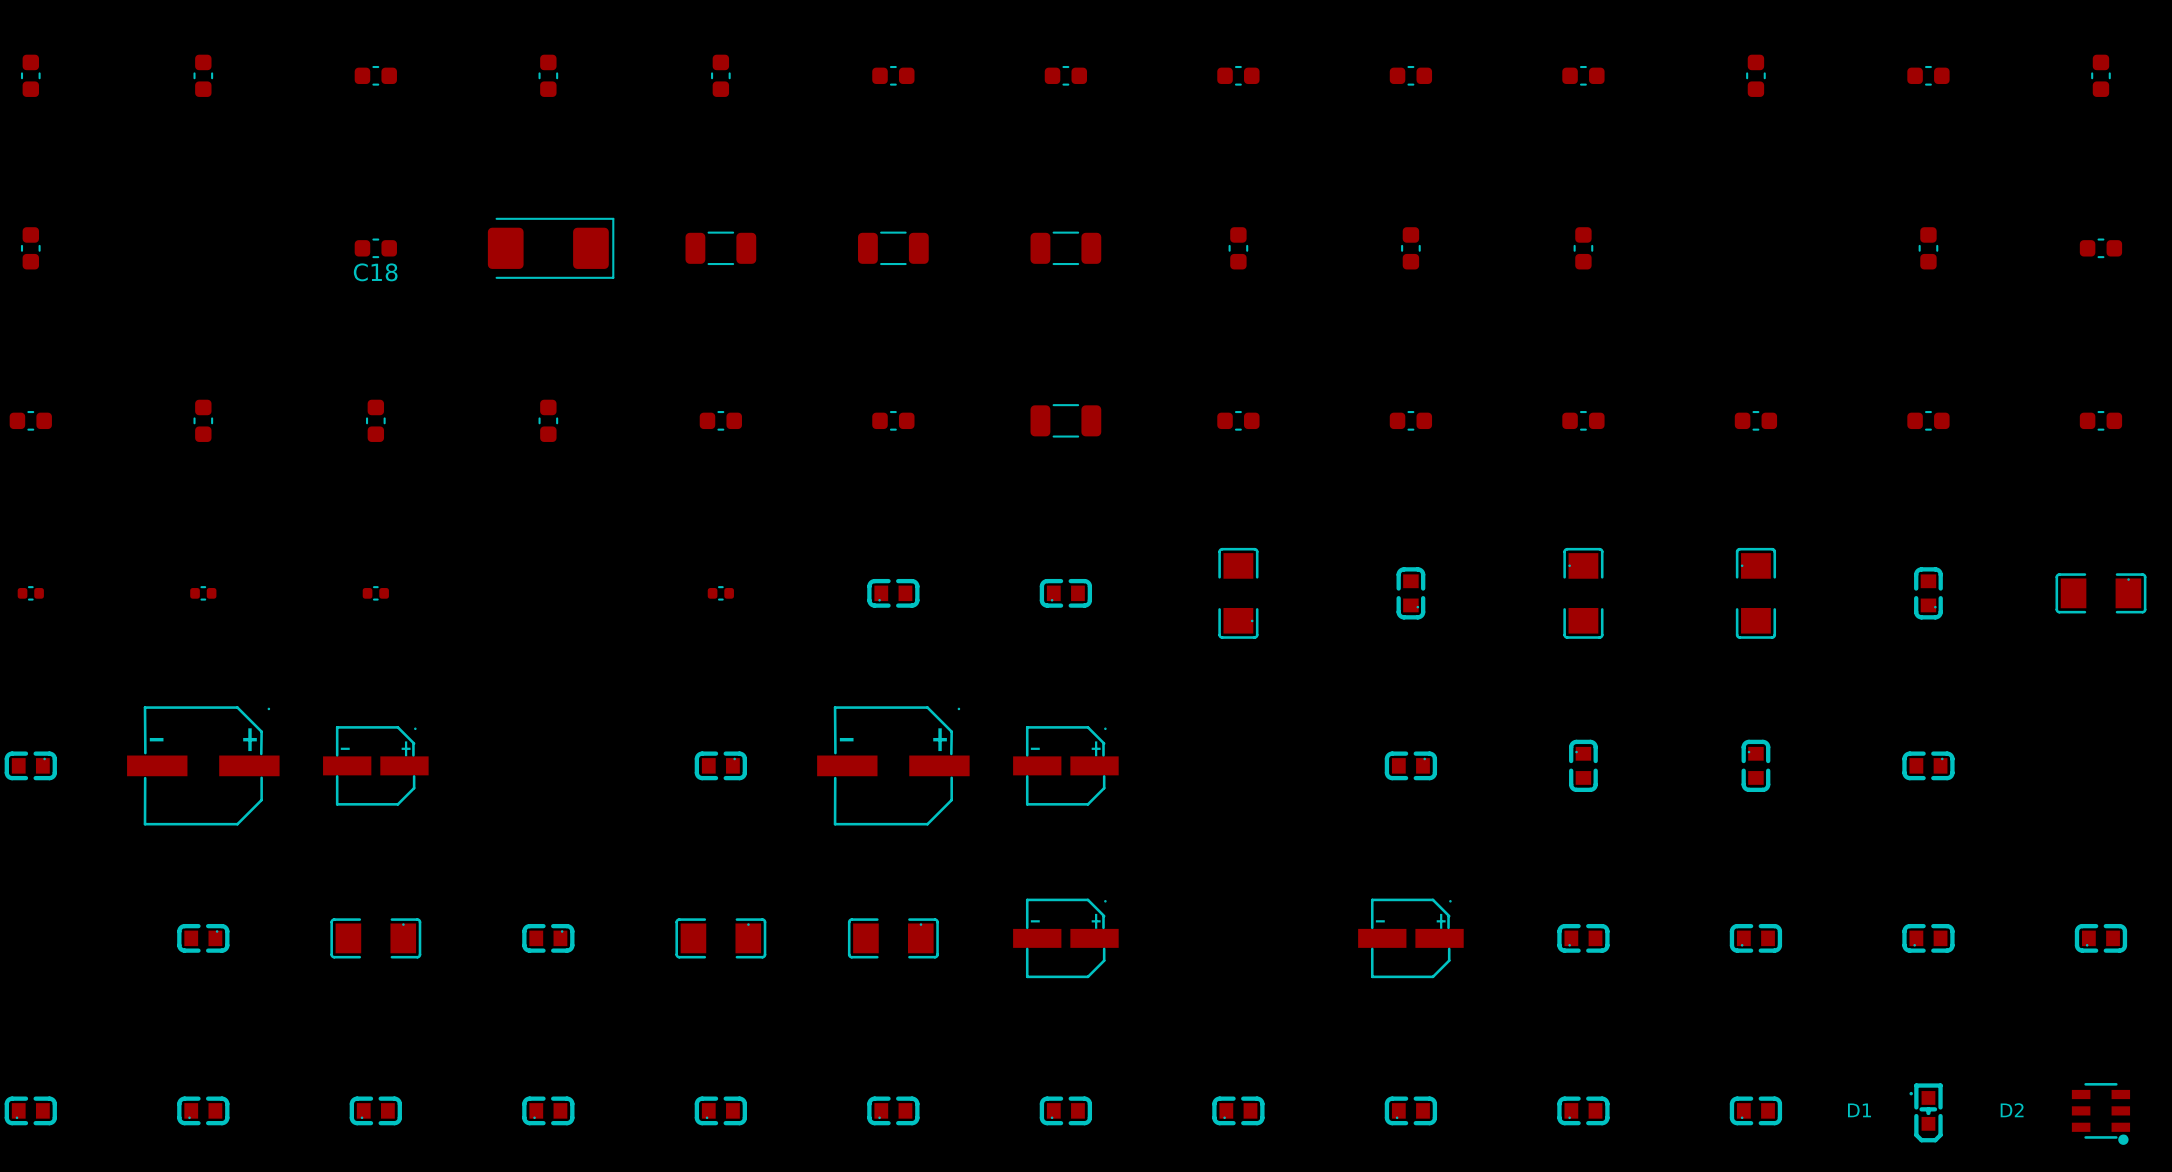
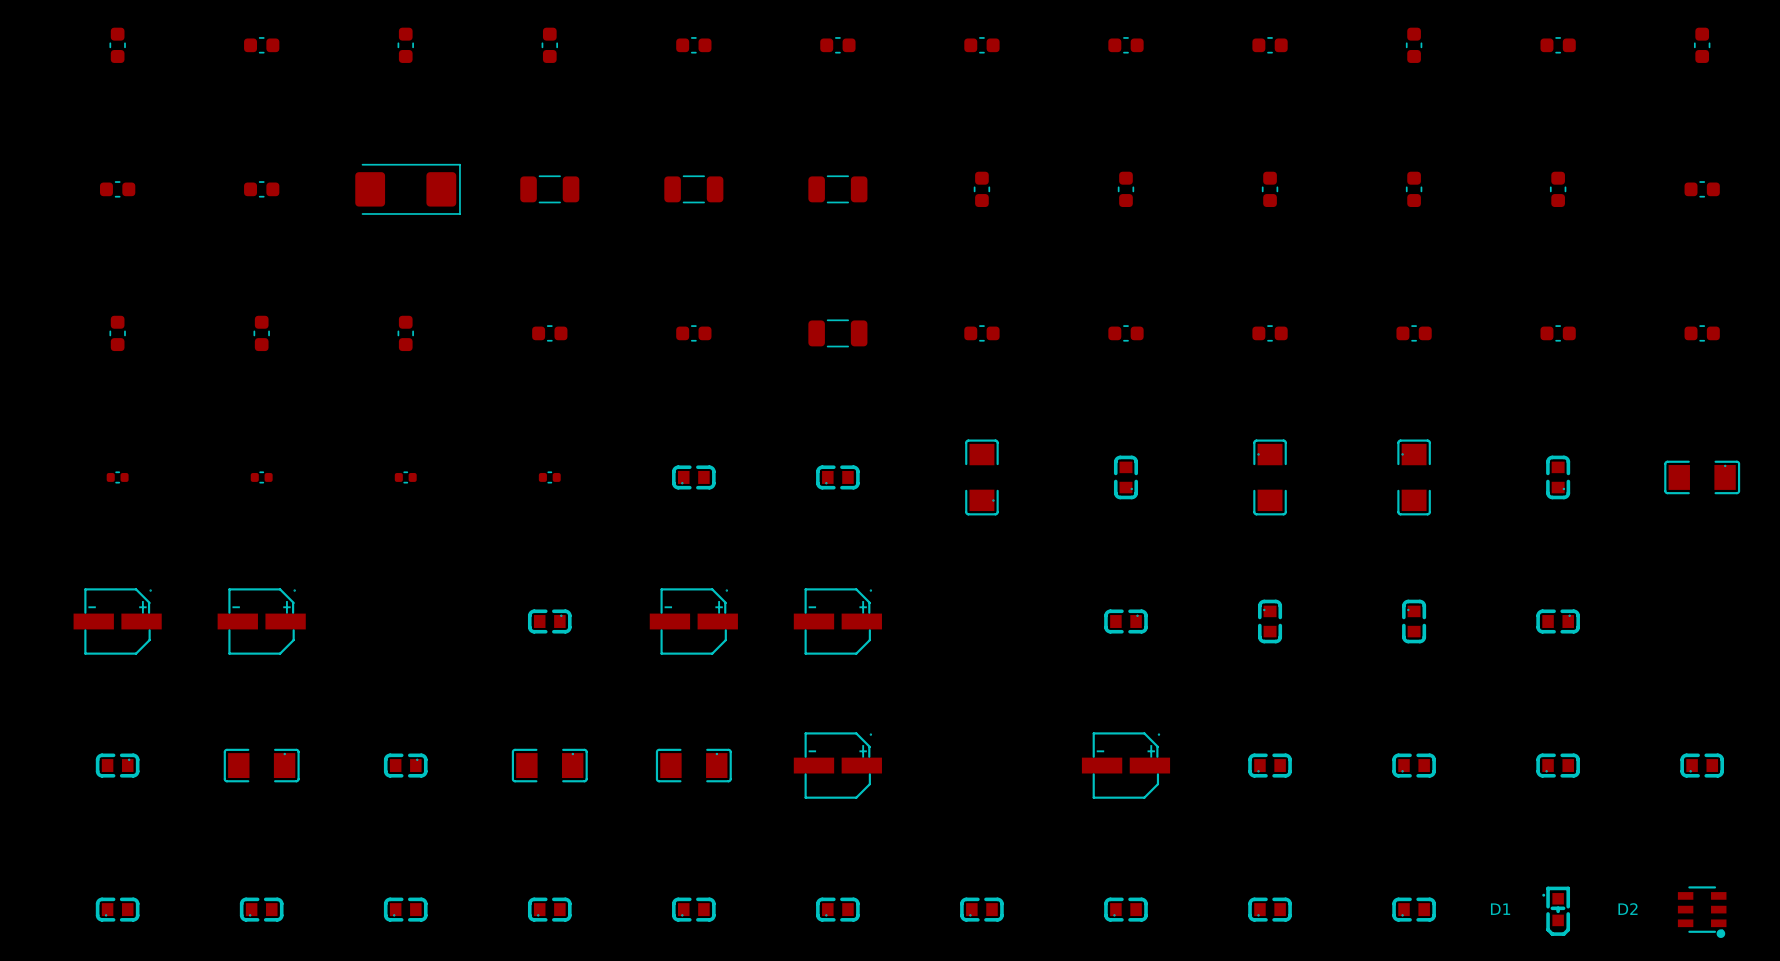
part: none -> (117, 189)
part: none -> (1414, 189)
C18 name: C18 (375, 272) -> none
part: none -> (405, 477)
part footprint: [127, 706, 280, 826] -> [73, 588, 162, 655]
part footprint: [817, 706, 970, 826] -> [649, 588, 738, 655]

